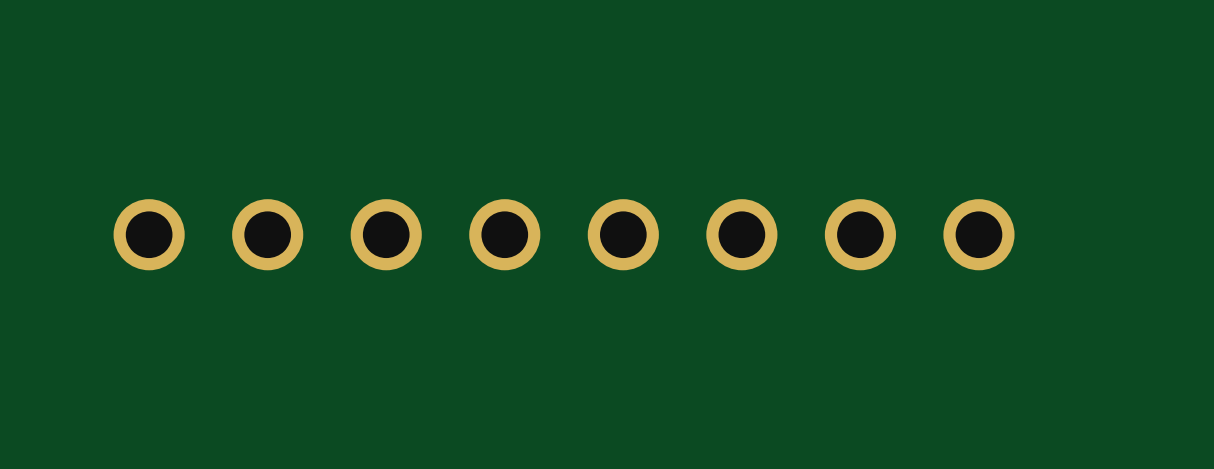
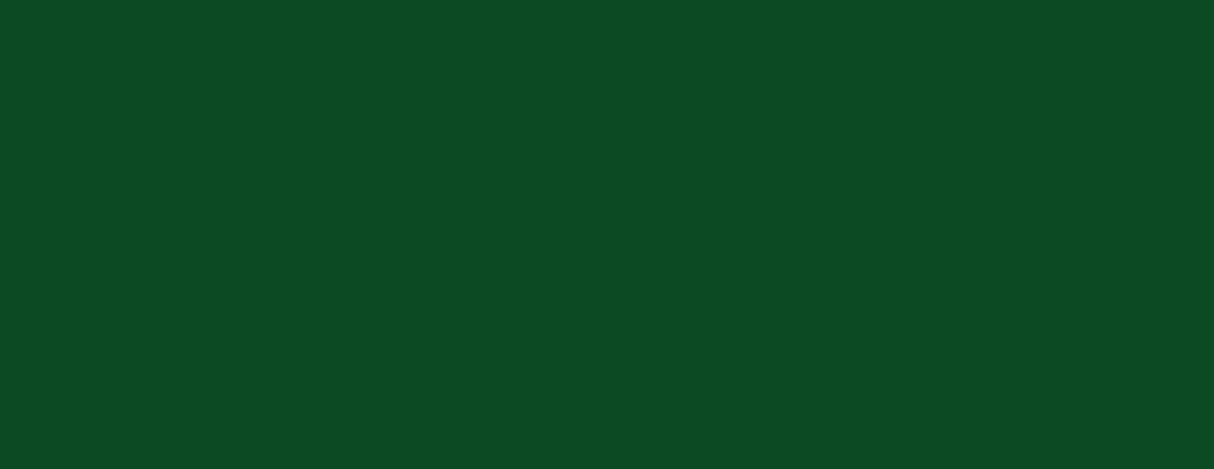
part: (564, 234) -> none

